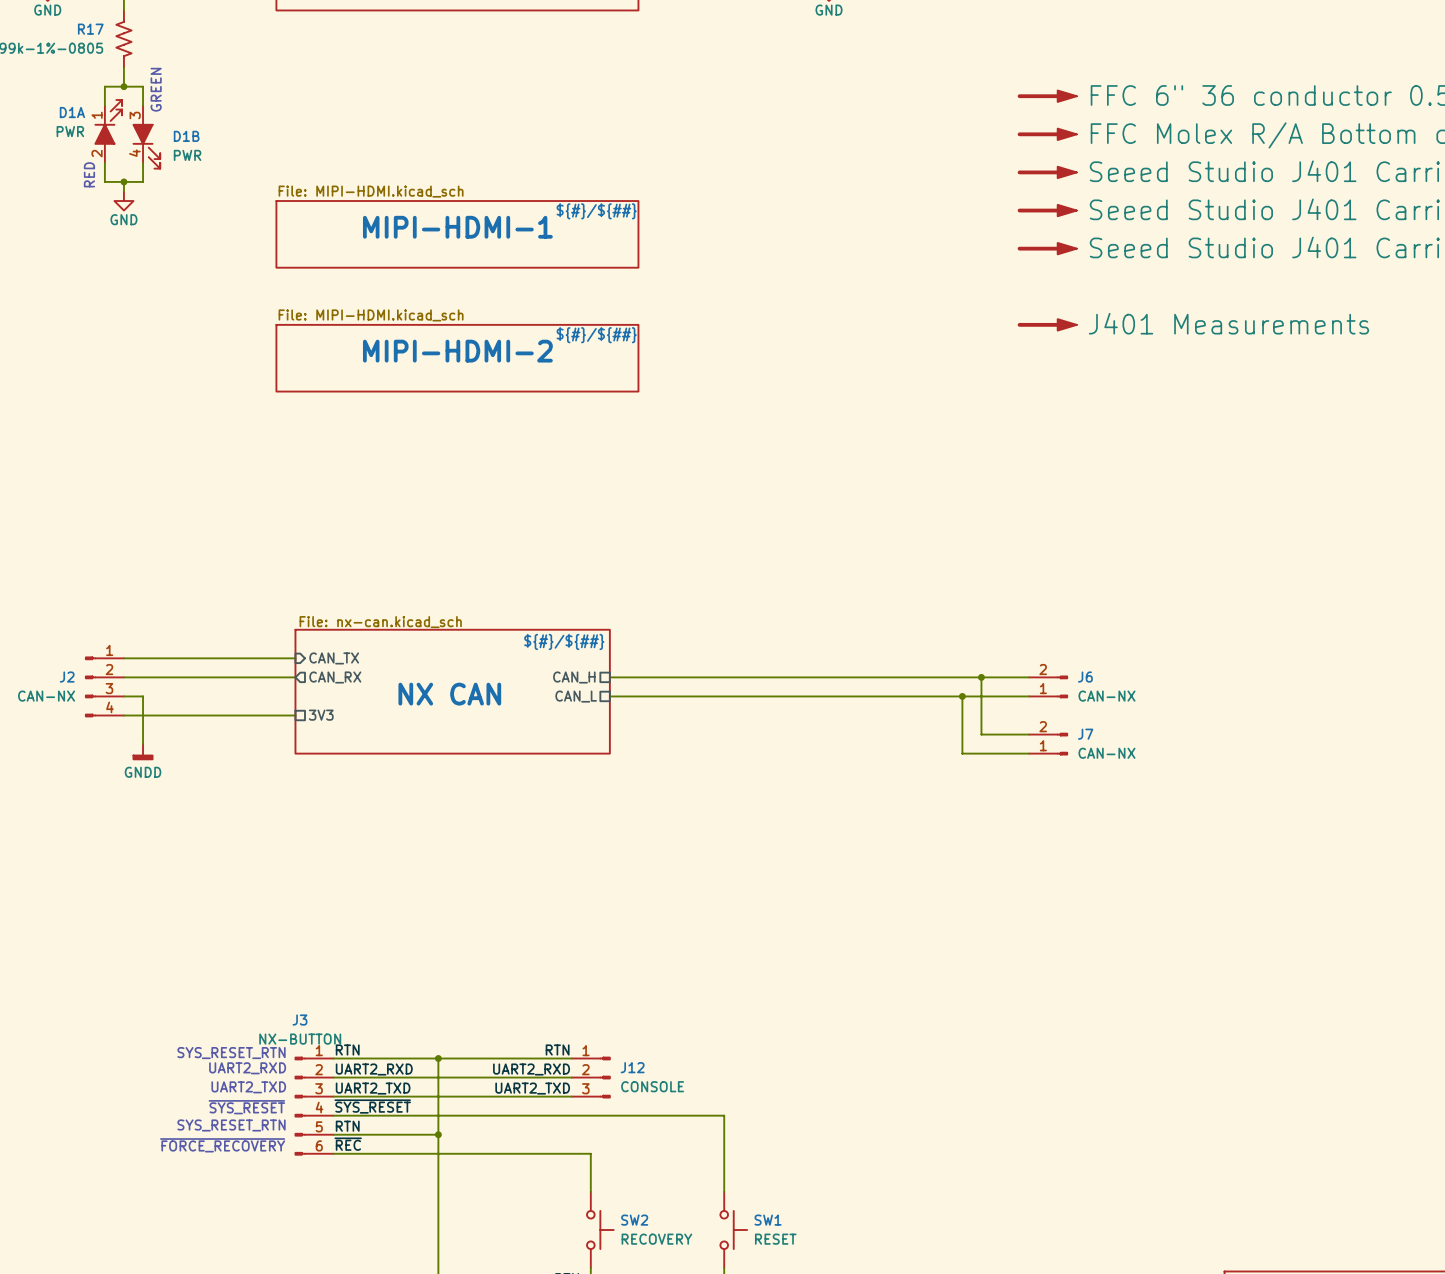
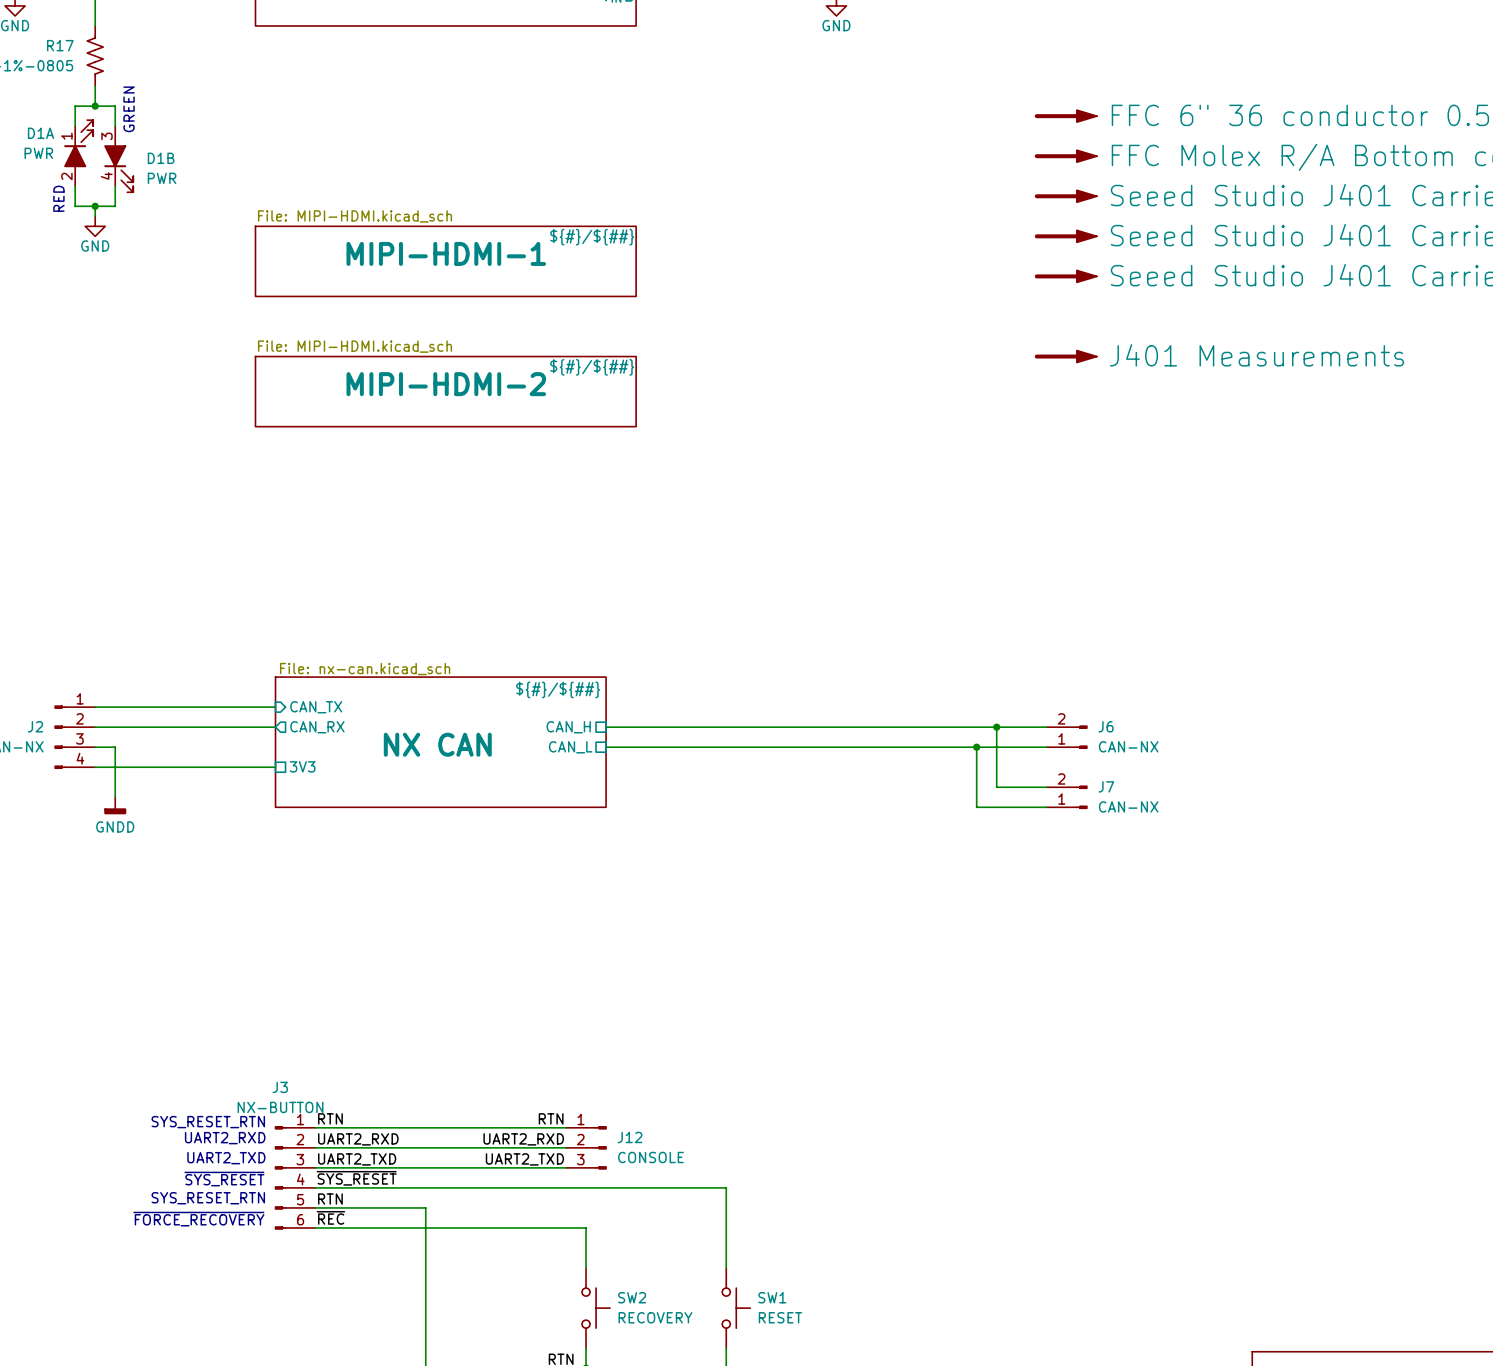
wire: (438, 1058) (438, 1134) -> none
junction: (438, 1058) -> none
junction: (438, 1134) -> none

